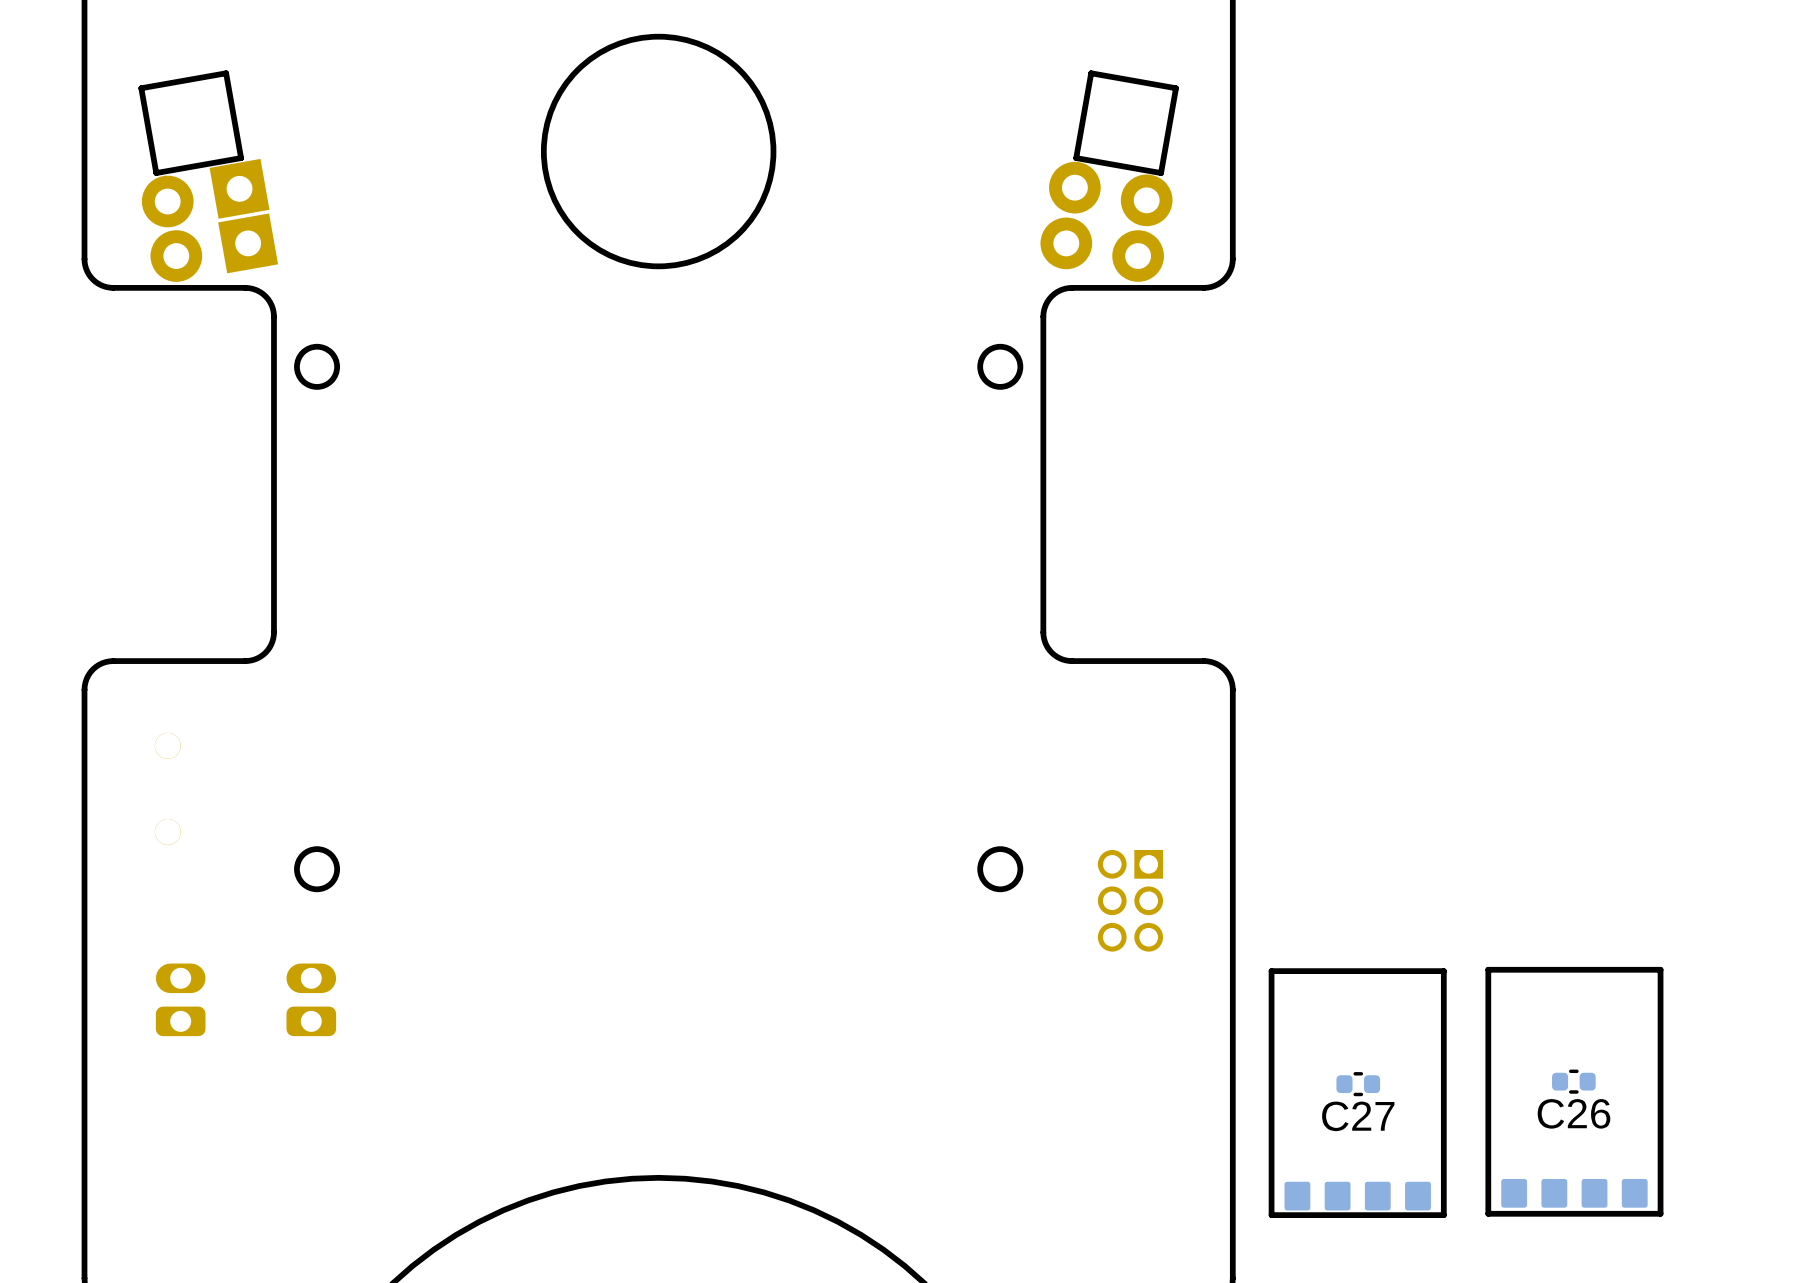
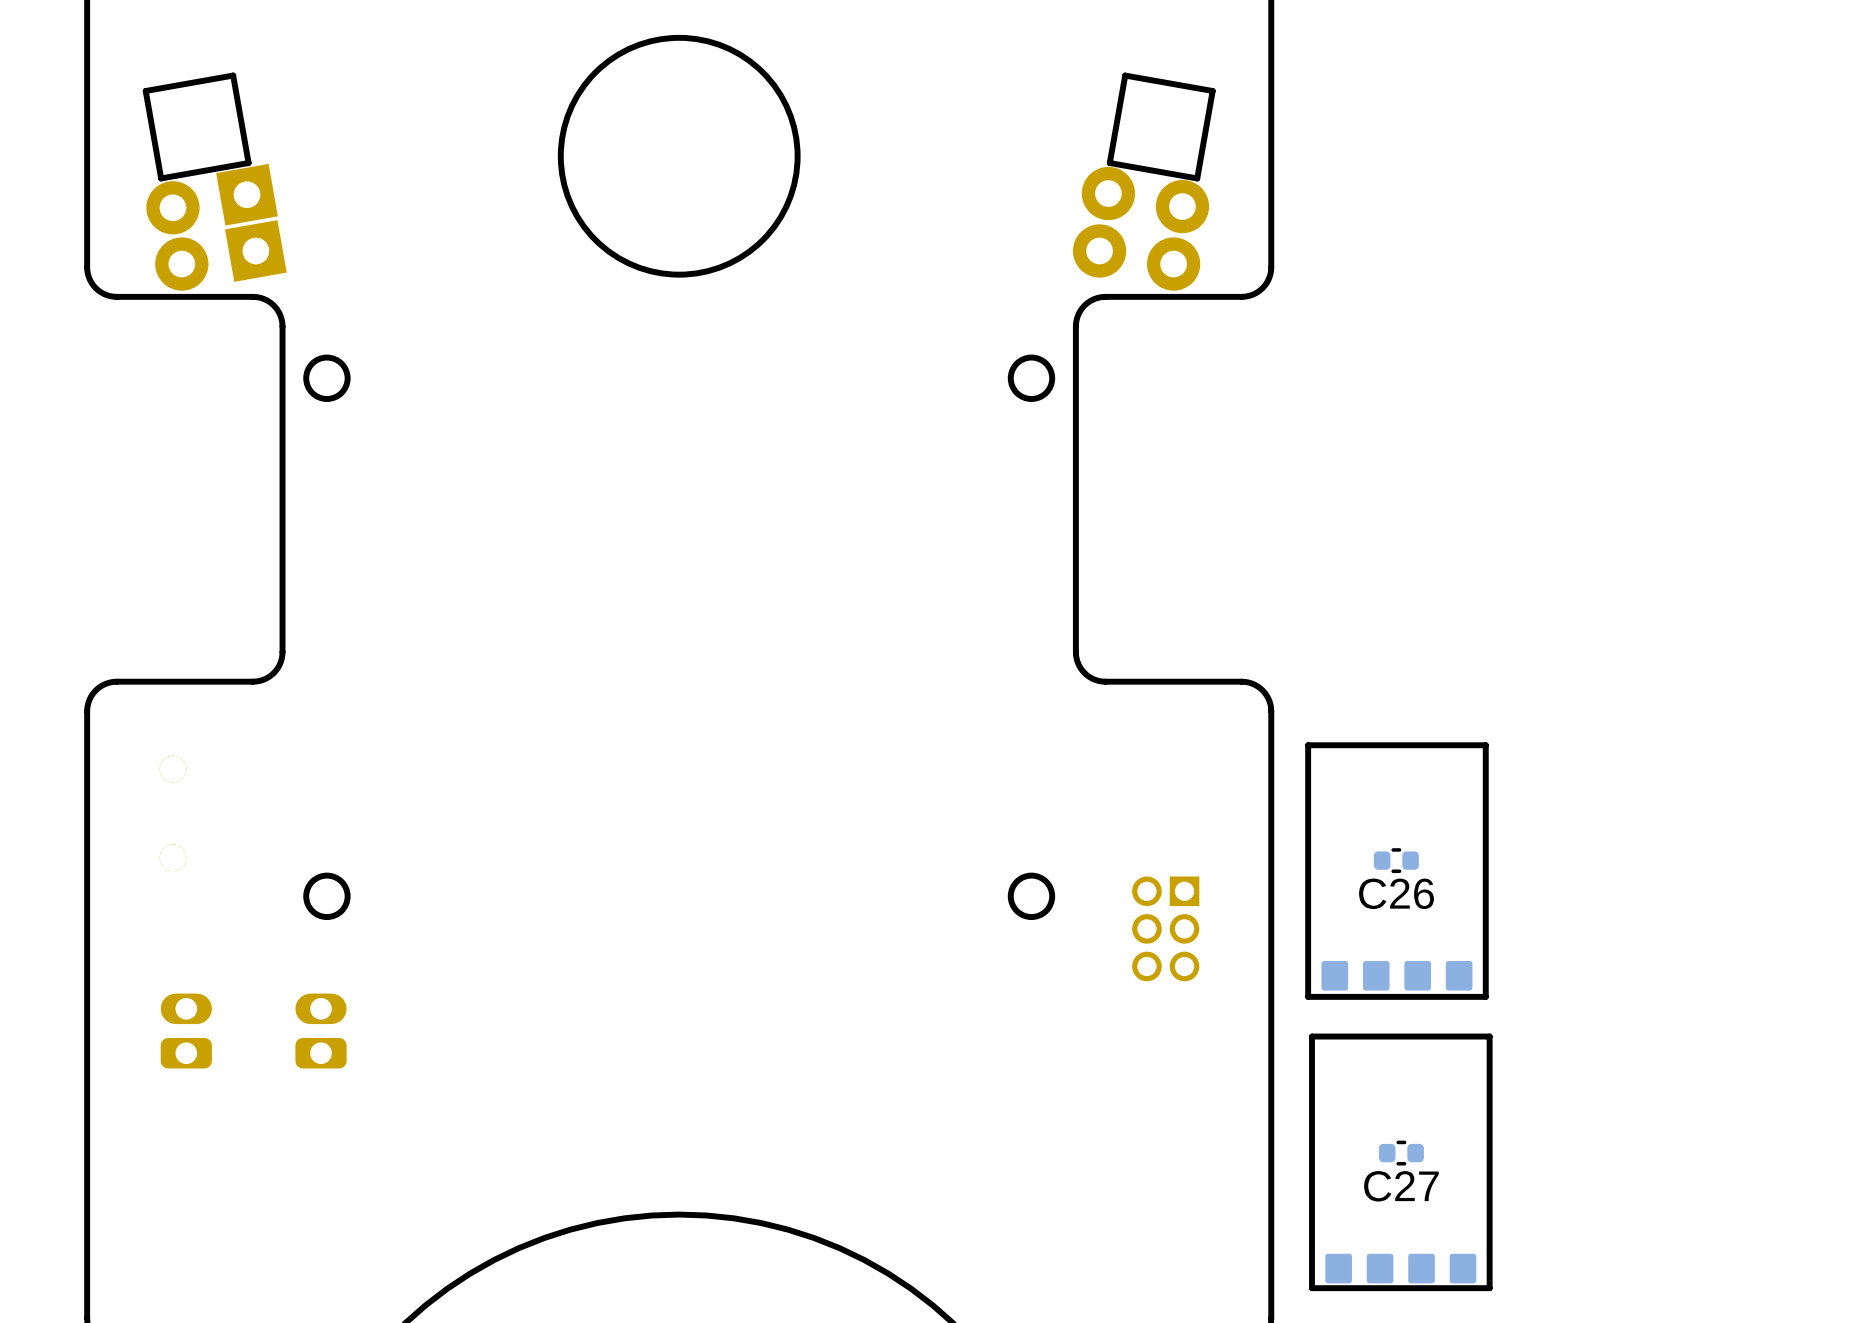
part: none -> (1396, 975)
board edge: (1660, 969) (1488, 969) (1488, 1213) (1660, 1213) (1660, 969) -> (1485, 745) (1308, 745) (1308, 996) (1485, 996) (1485, 745)
board edge: (1443, 971) (1443, 1215) (1271, 1215) (1271, 971) (1443, 971) -> (1489, 1036) (1489, 1288) (1312, 1288) (1312, 1036) (1489, 1036)
C26 position: (1573, 1081) -> (1396, 860)
C27 position: (1358, 1084) -> (1401, 1153)
part: (1574, 1193) -> none
part position: (1357, 1196) -> (1400, 1268)

